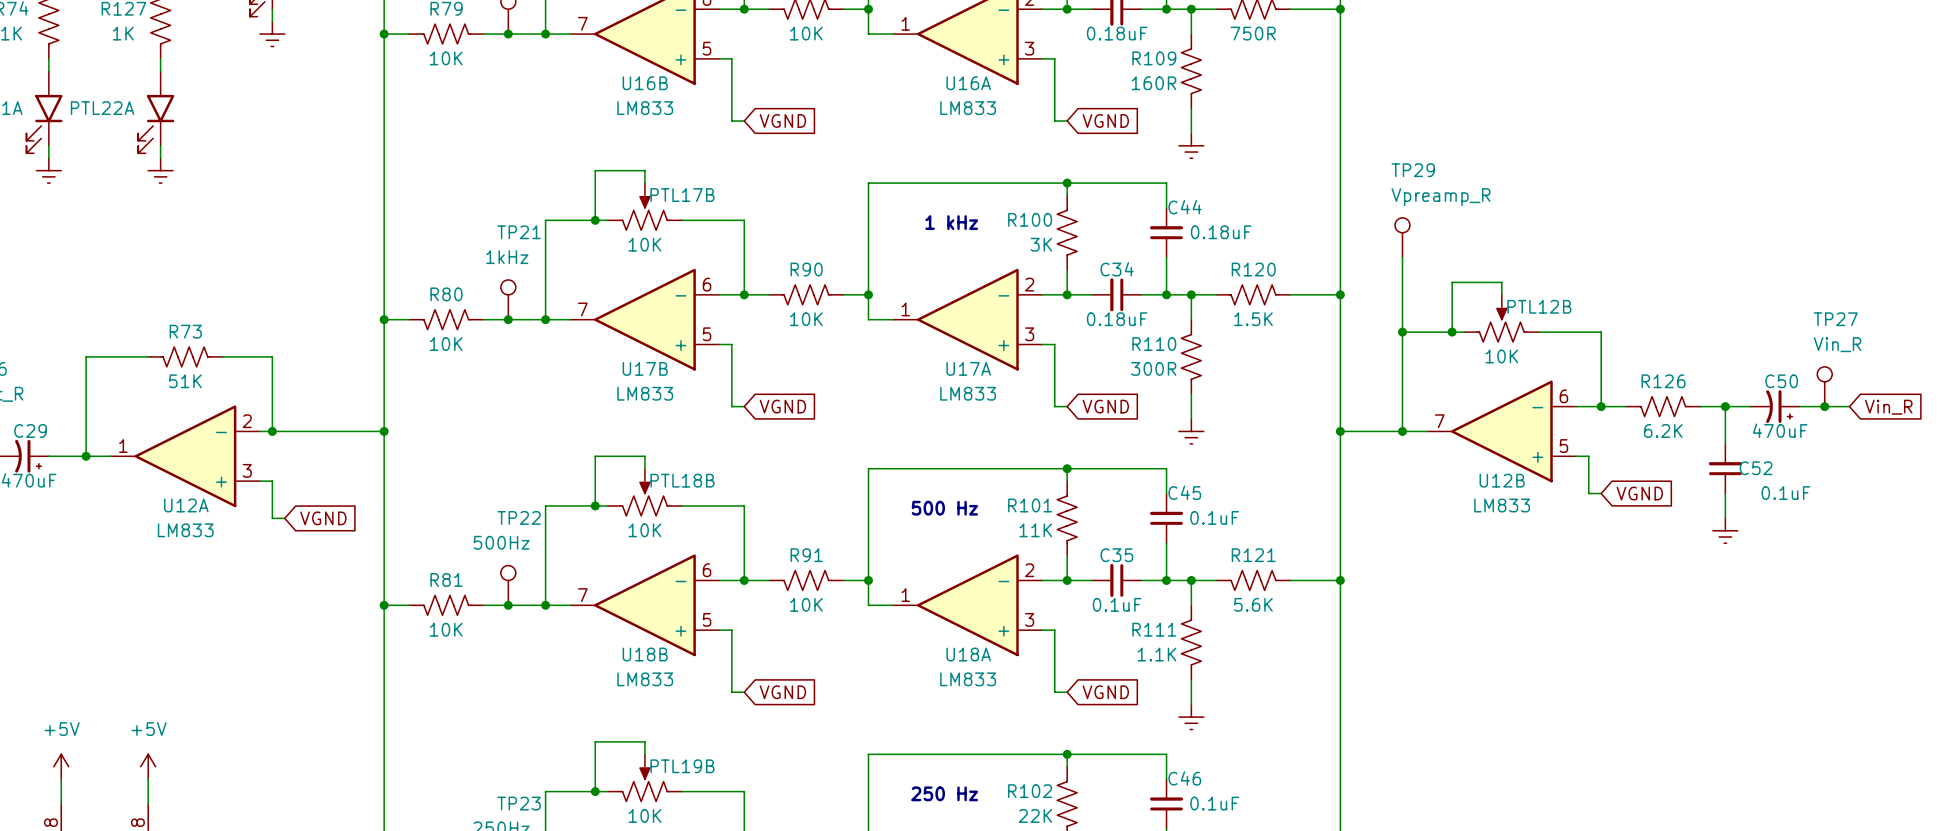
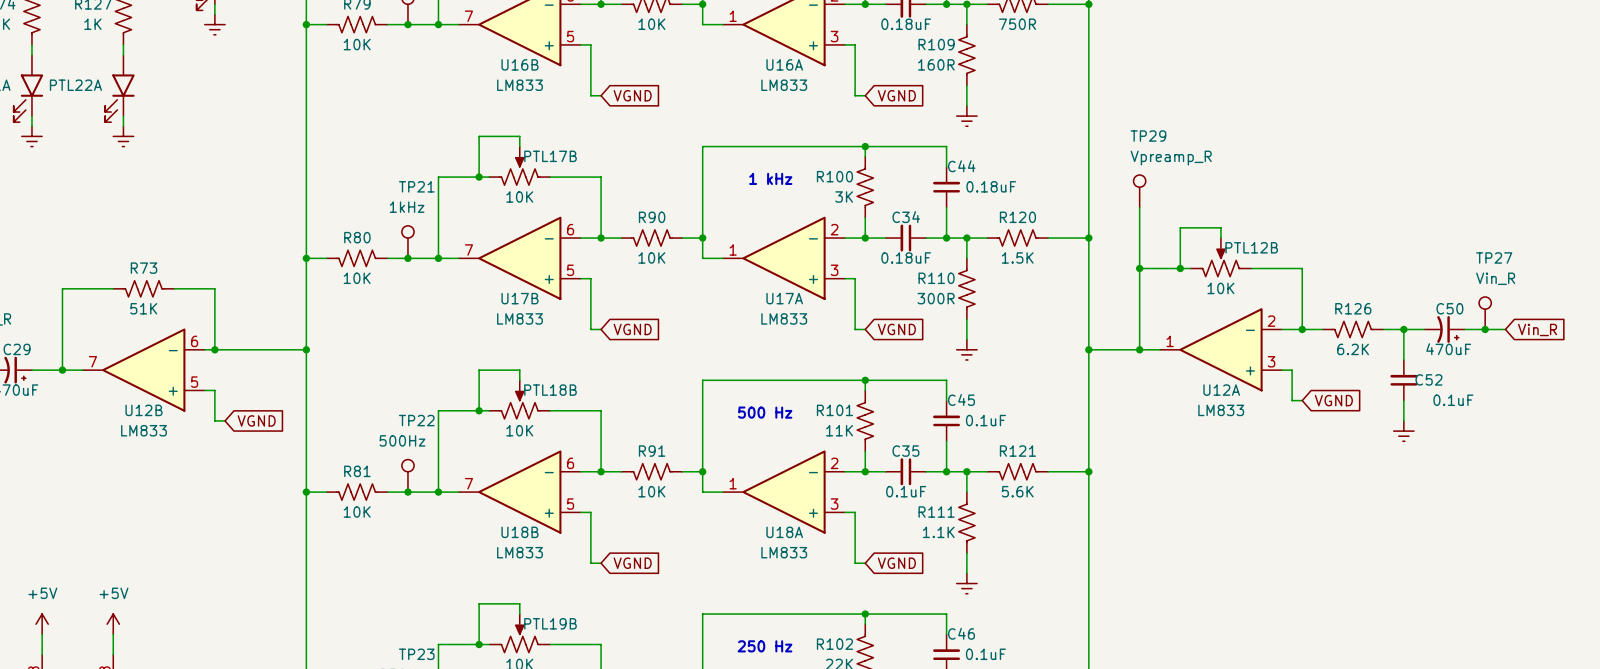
U12B position: (1501, 431) -> (143, 370)
U12A position: (185, 456) -> (1220, 349)

